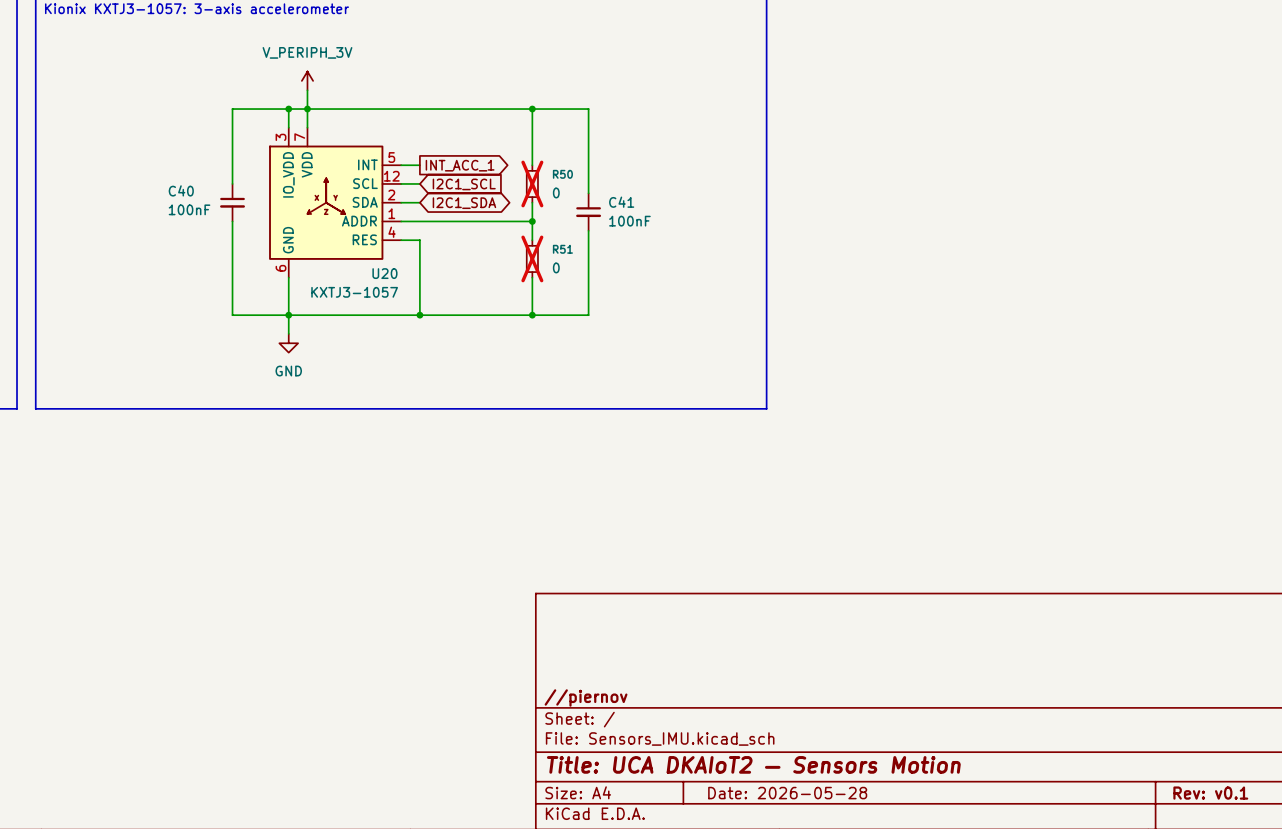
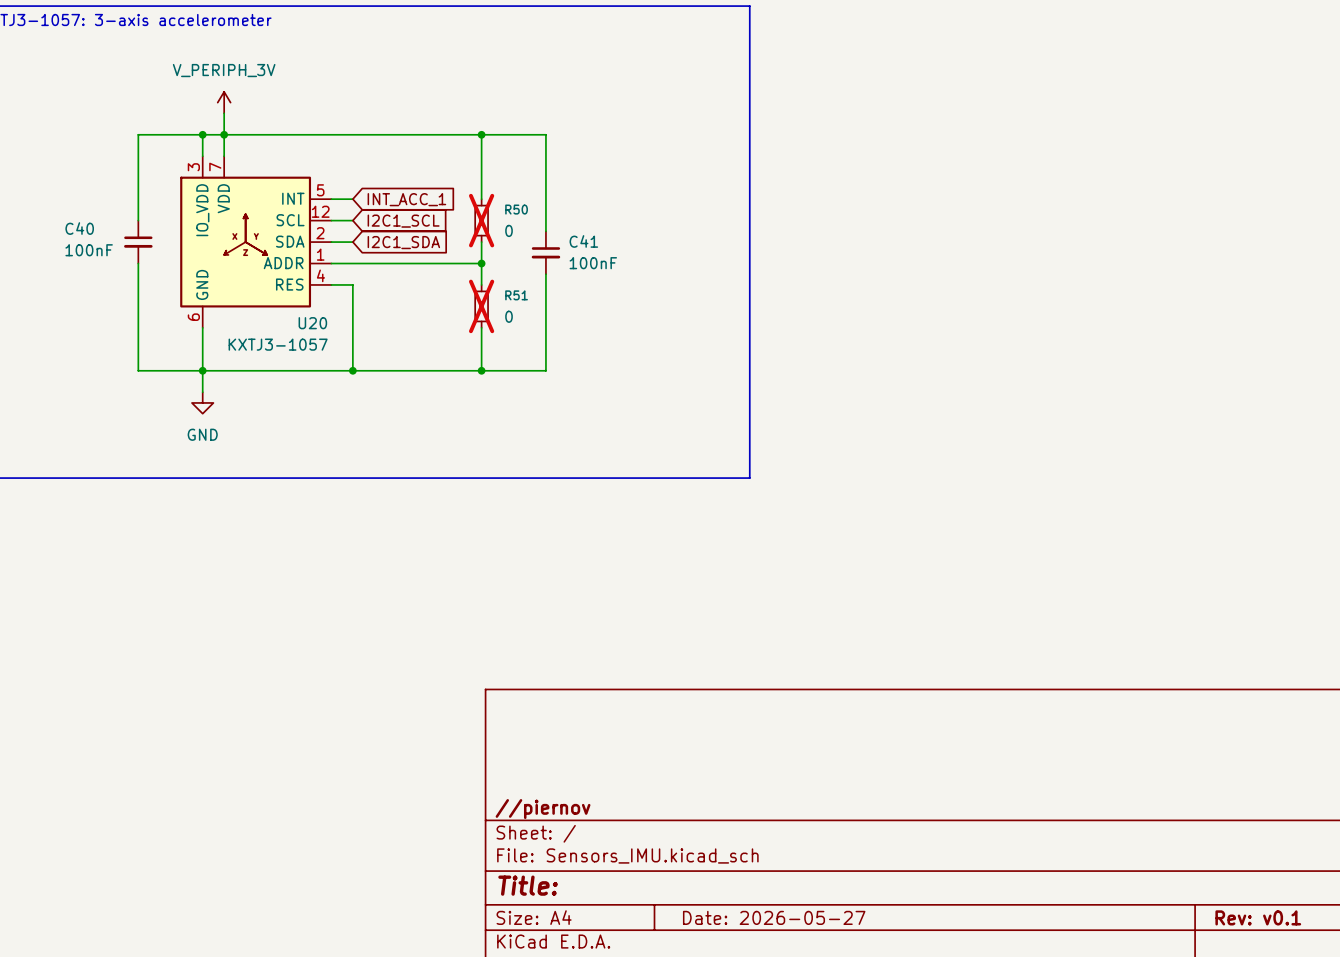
global label shape: output (460, 165) -> input (406, 199)
global label shape: bidirectional (464, 203) -> input (403, 242)
title block: Title: UCA DKAIoT2 — Sensors Motion (753, 764) -> Title: (528, 885)
title block: Date: 2026-05-28 (787, 793) -> Date: 2026-05-27 (774, 917)

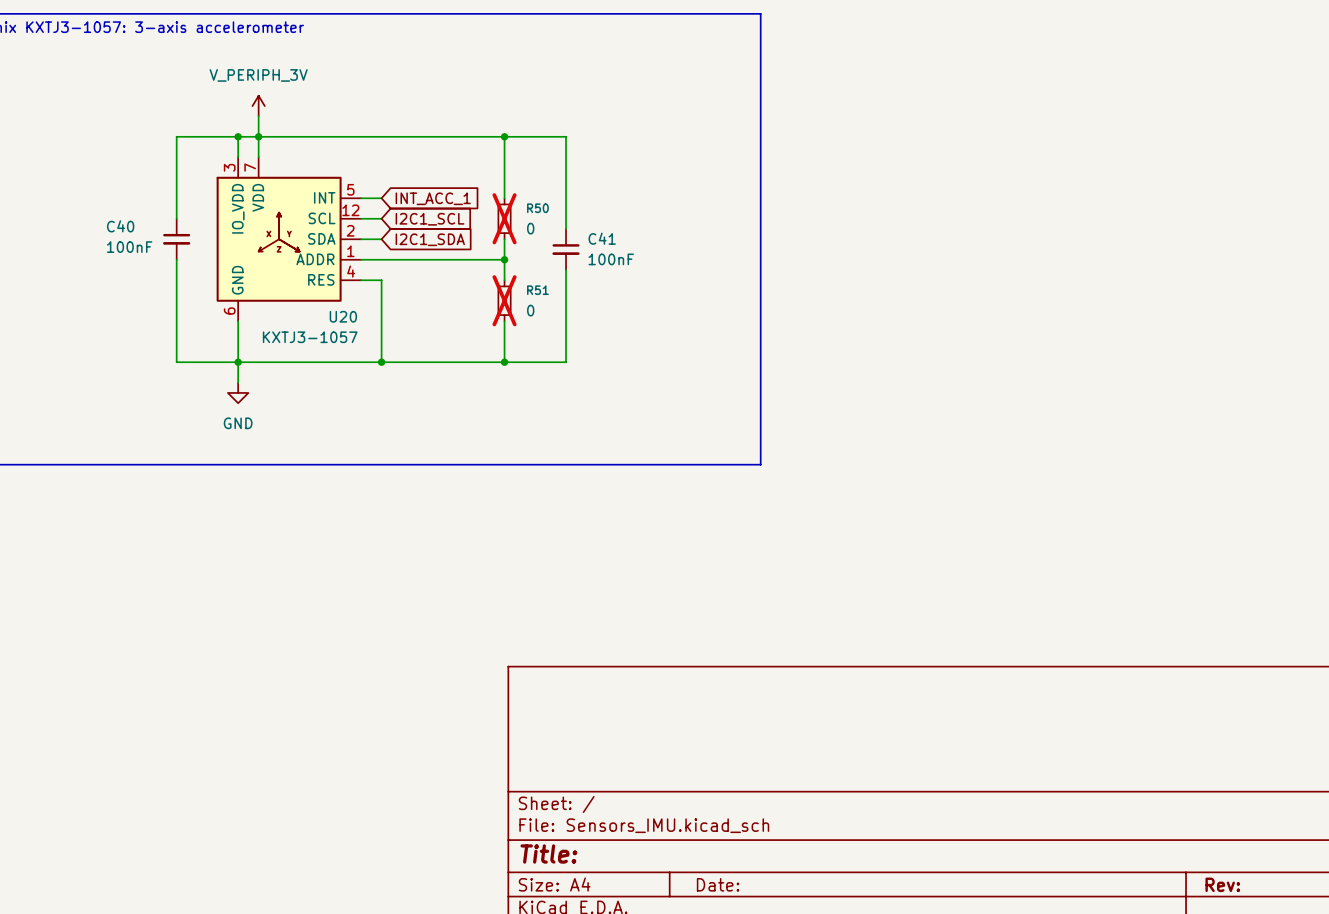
title block: //piernov (543, 809) -> none
title block: Date: 2026-05-27 (774, 917) -> Date: (718, 884)
title block: Rev: v0.1 (1258, 917) -> Rev: (1222, 884)

